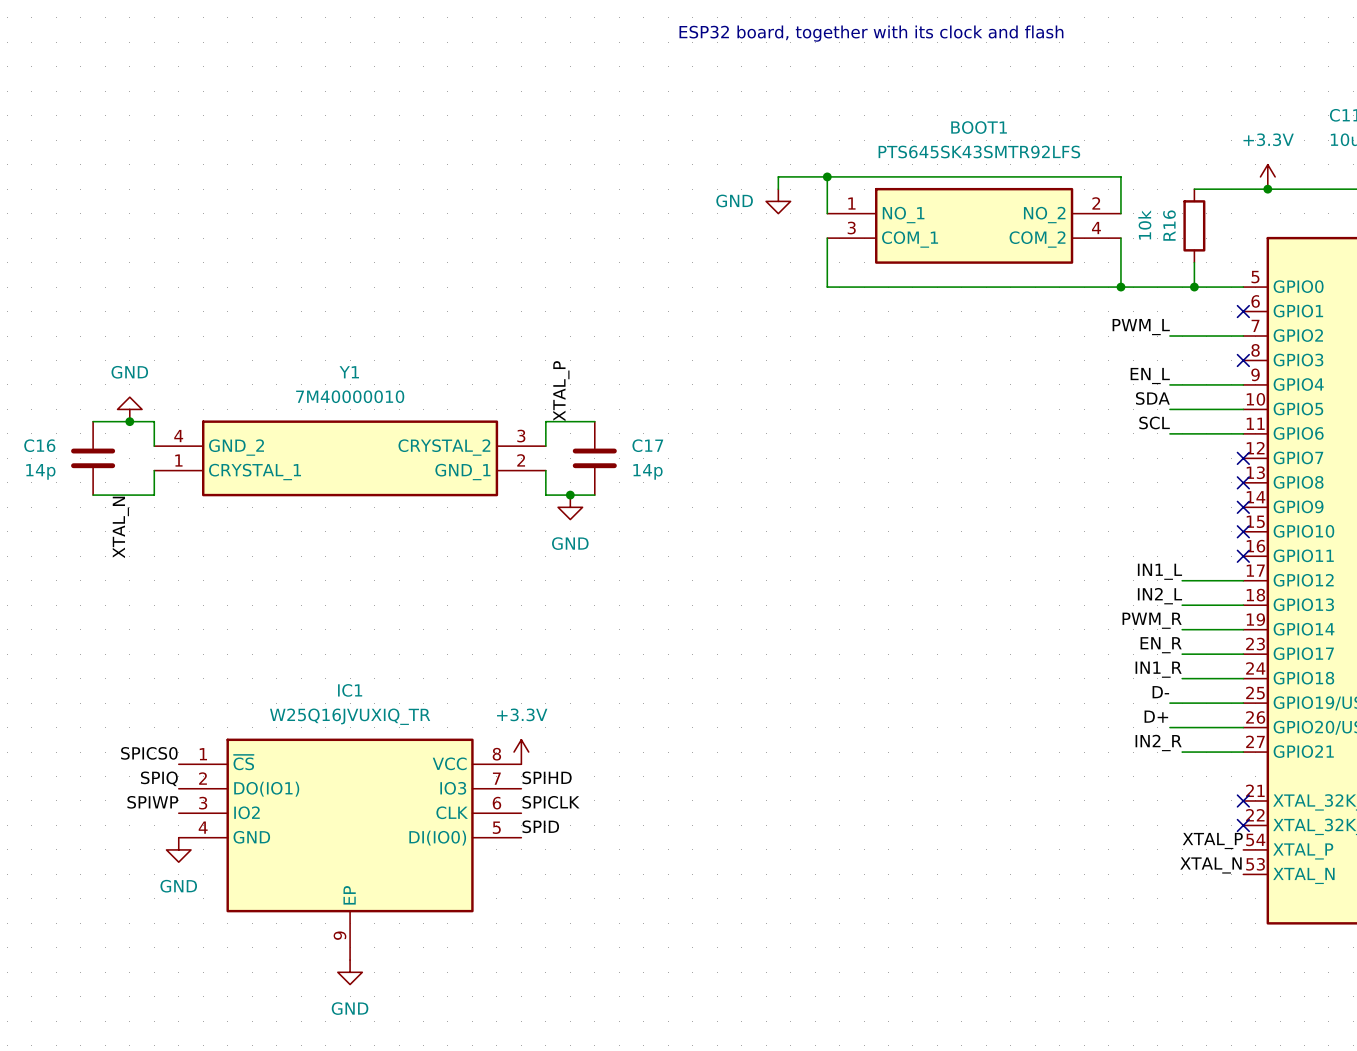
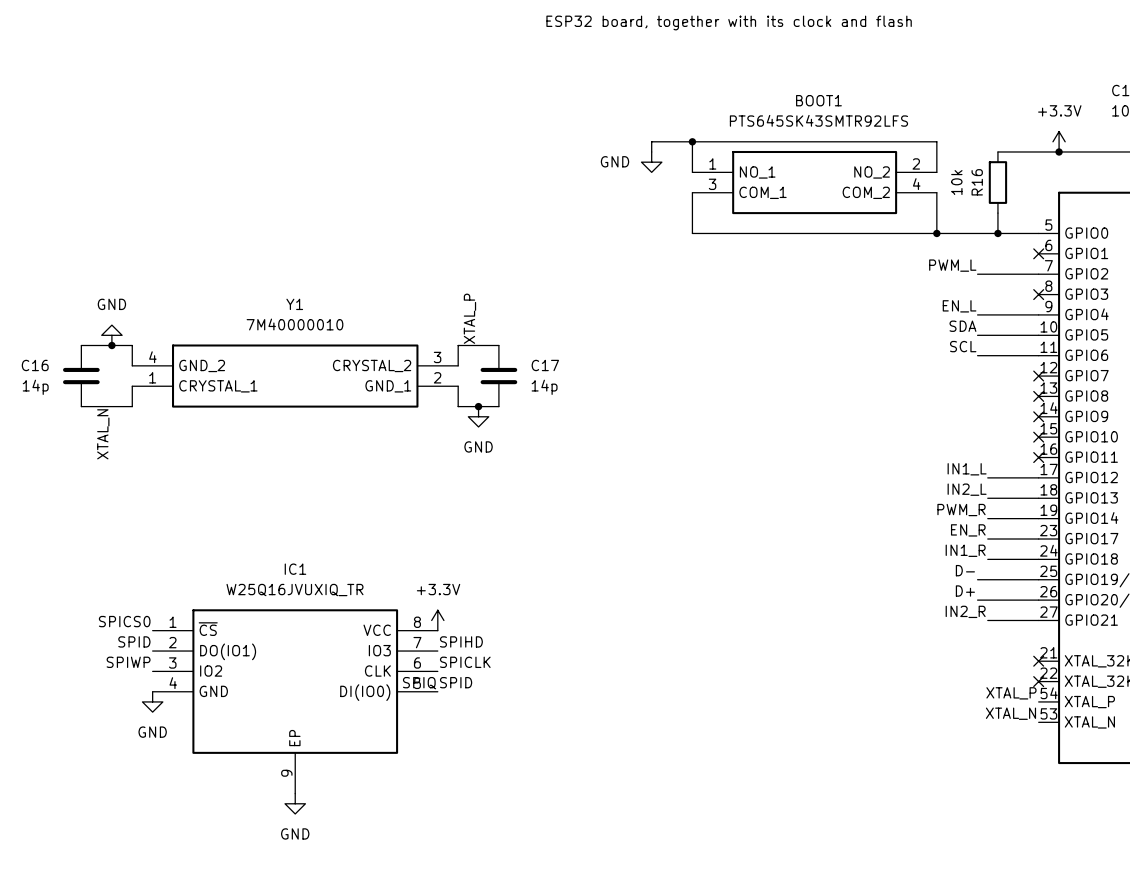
label: SPIQ (159, 778) -> SPID (134, 641)
label: none -> SPIQ (419, 683)

